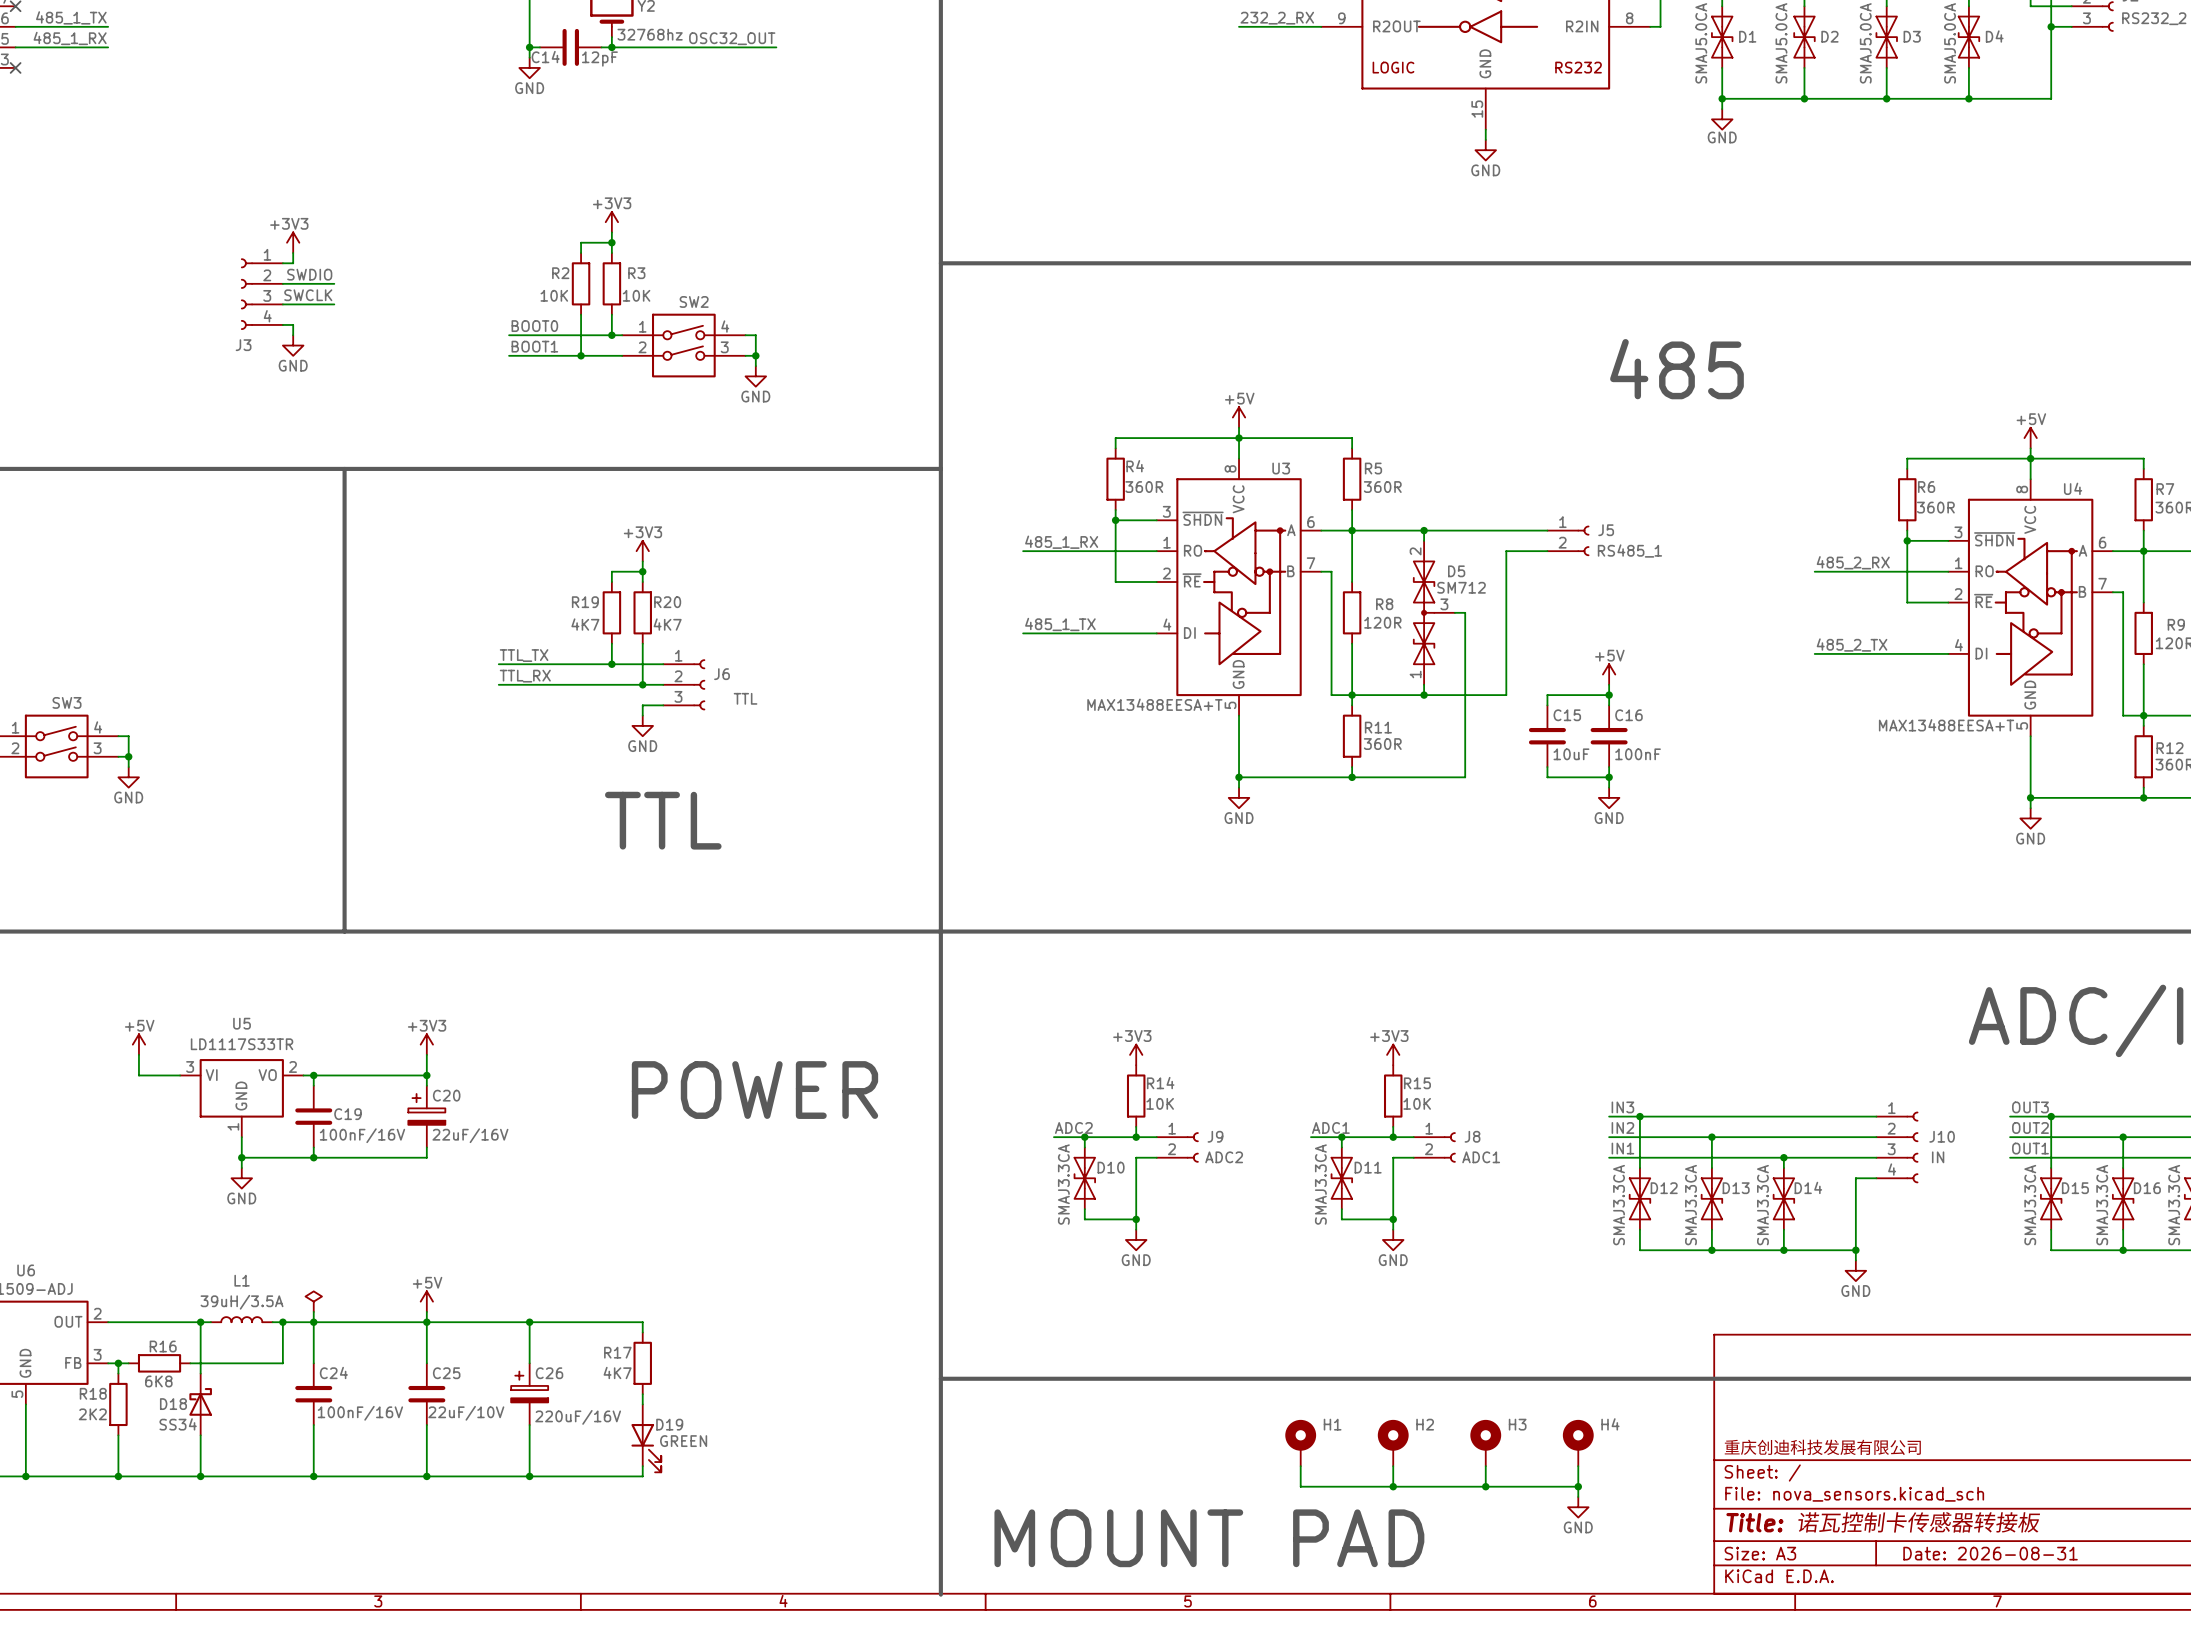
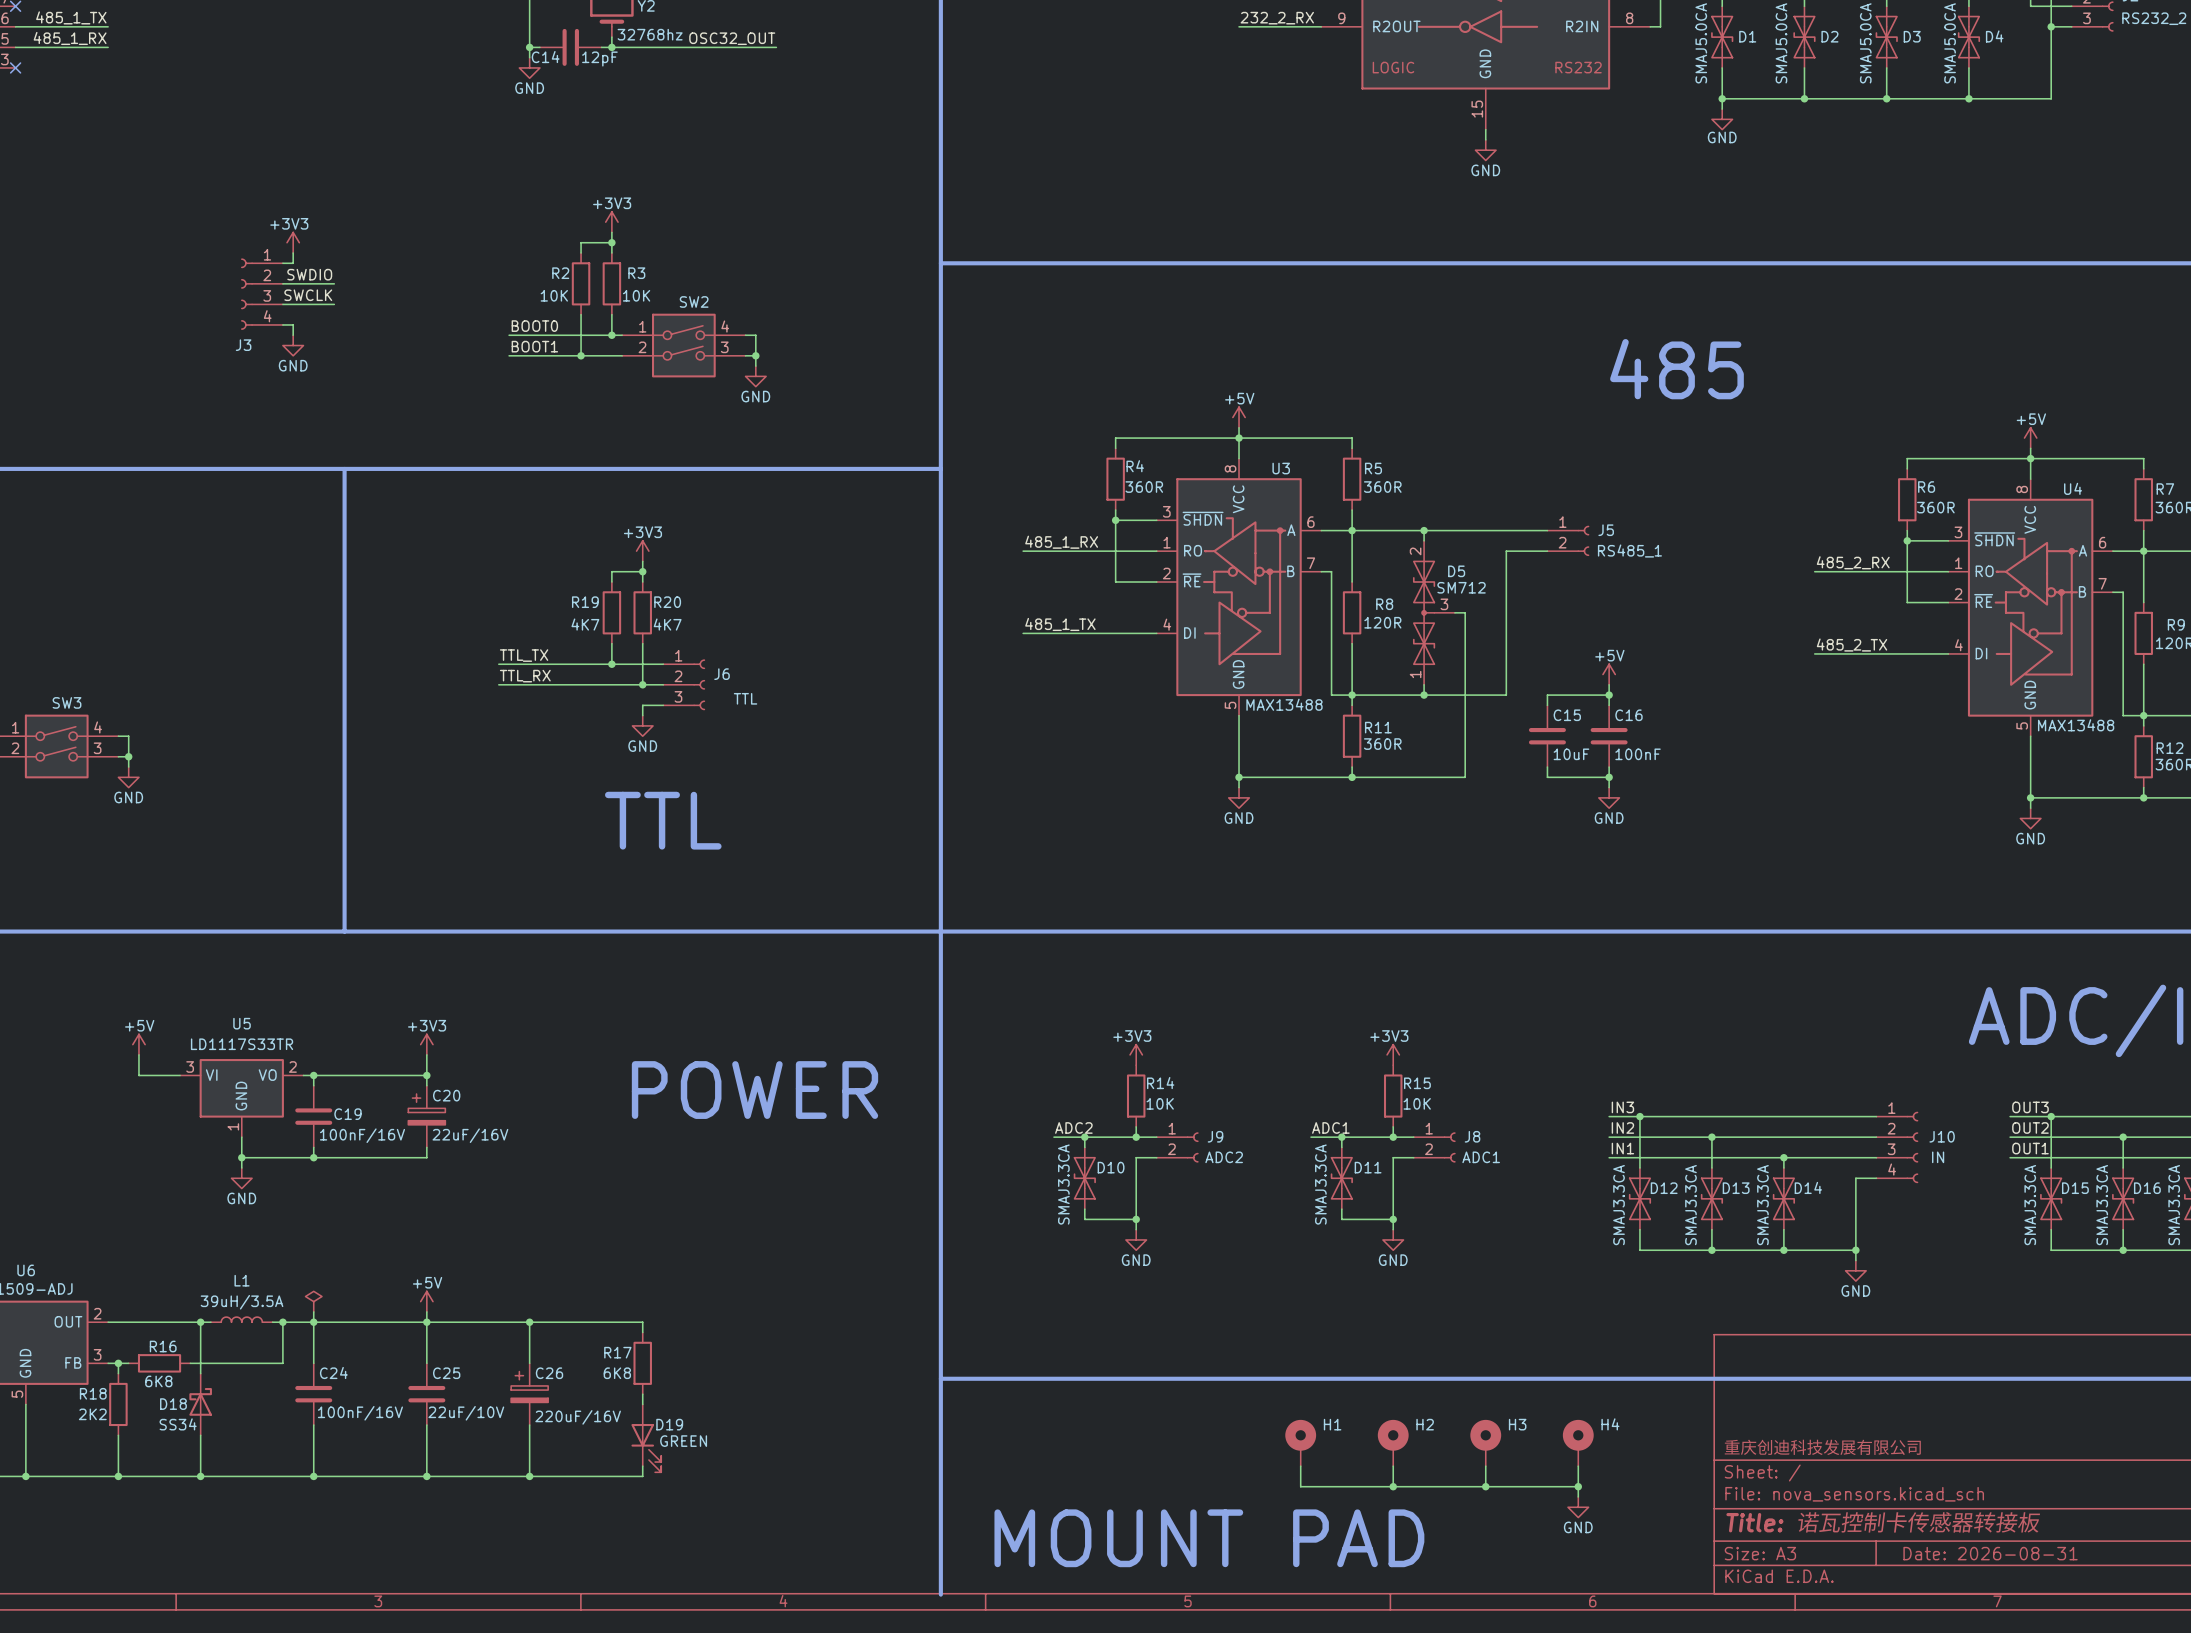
U3 value: MAX13488EESA+T (1154, 704) -> MAX13488 (1284, 704)
U4 value: MAX13488EESA+T (1946, 725) -> MAX13488 (2076, 725)
R17 value: 4K7 (617, 1372) -> 6K8 (617, 1373)

